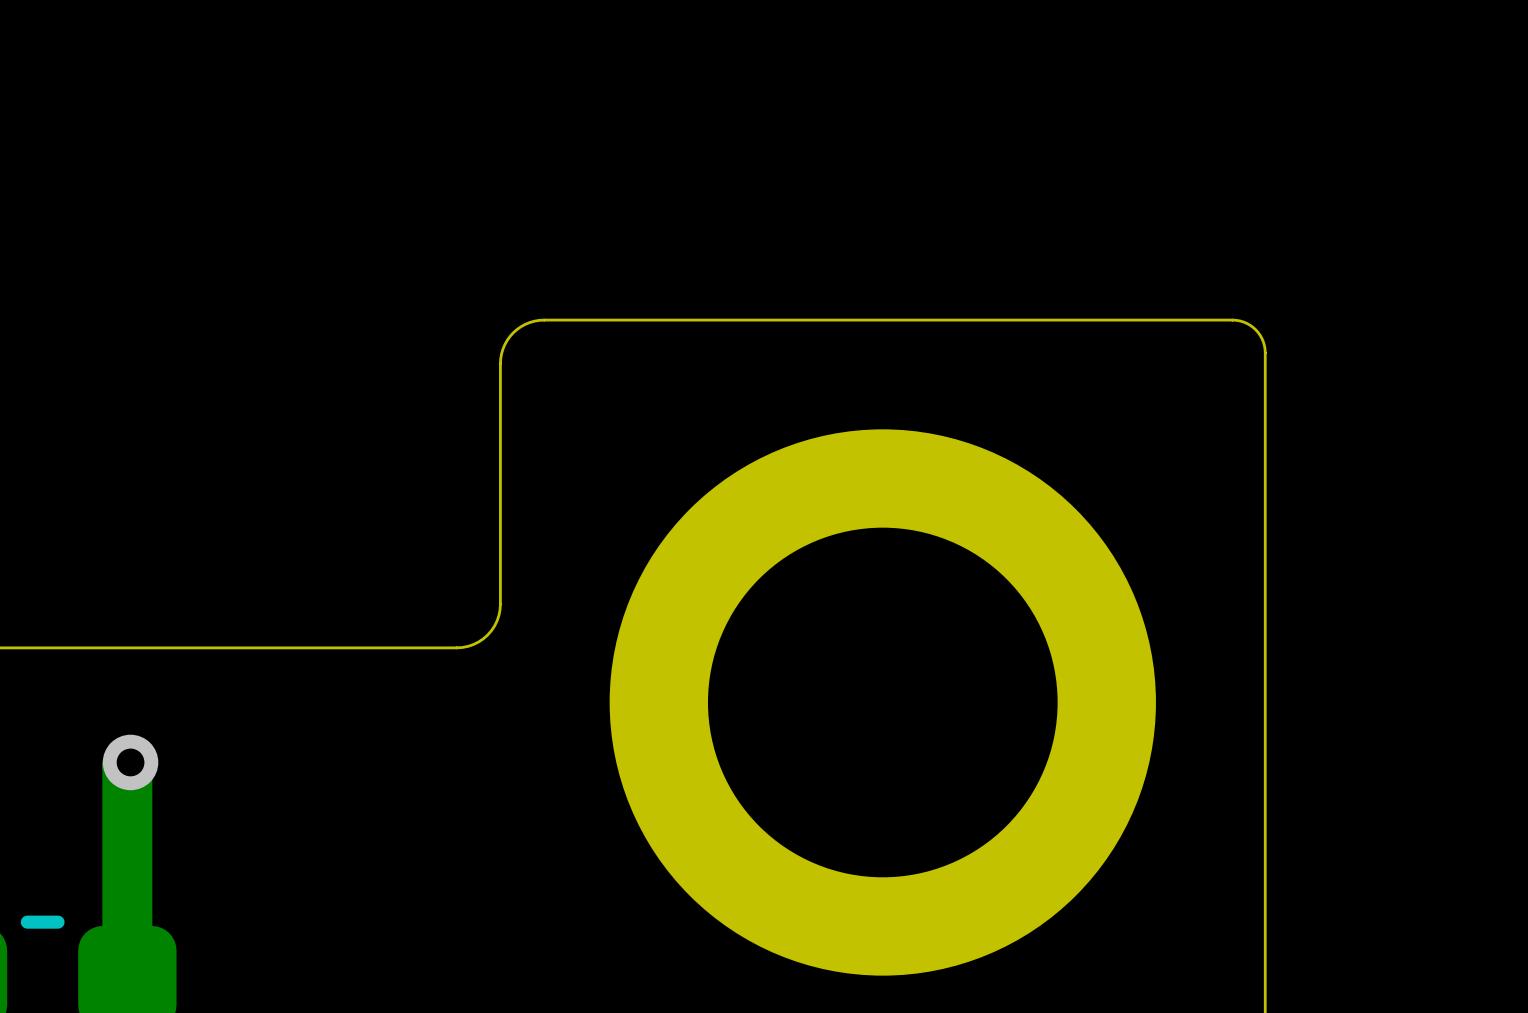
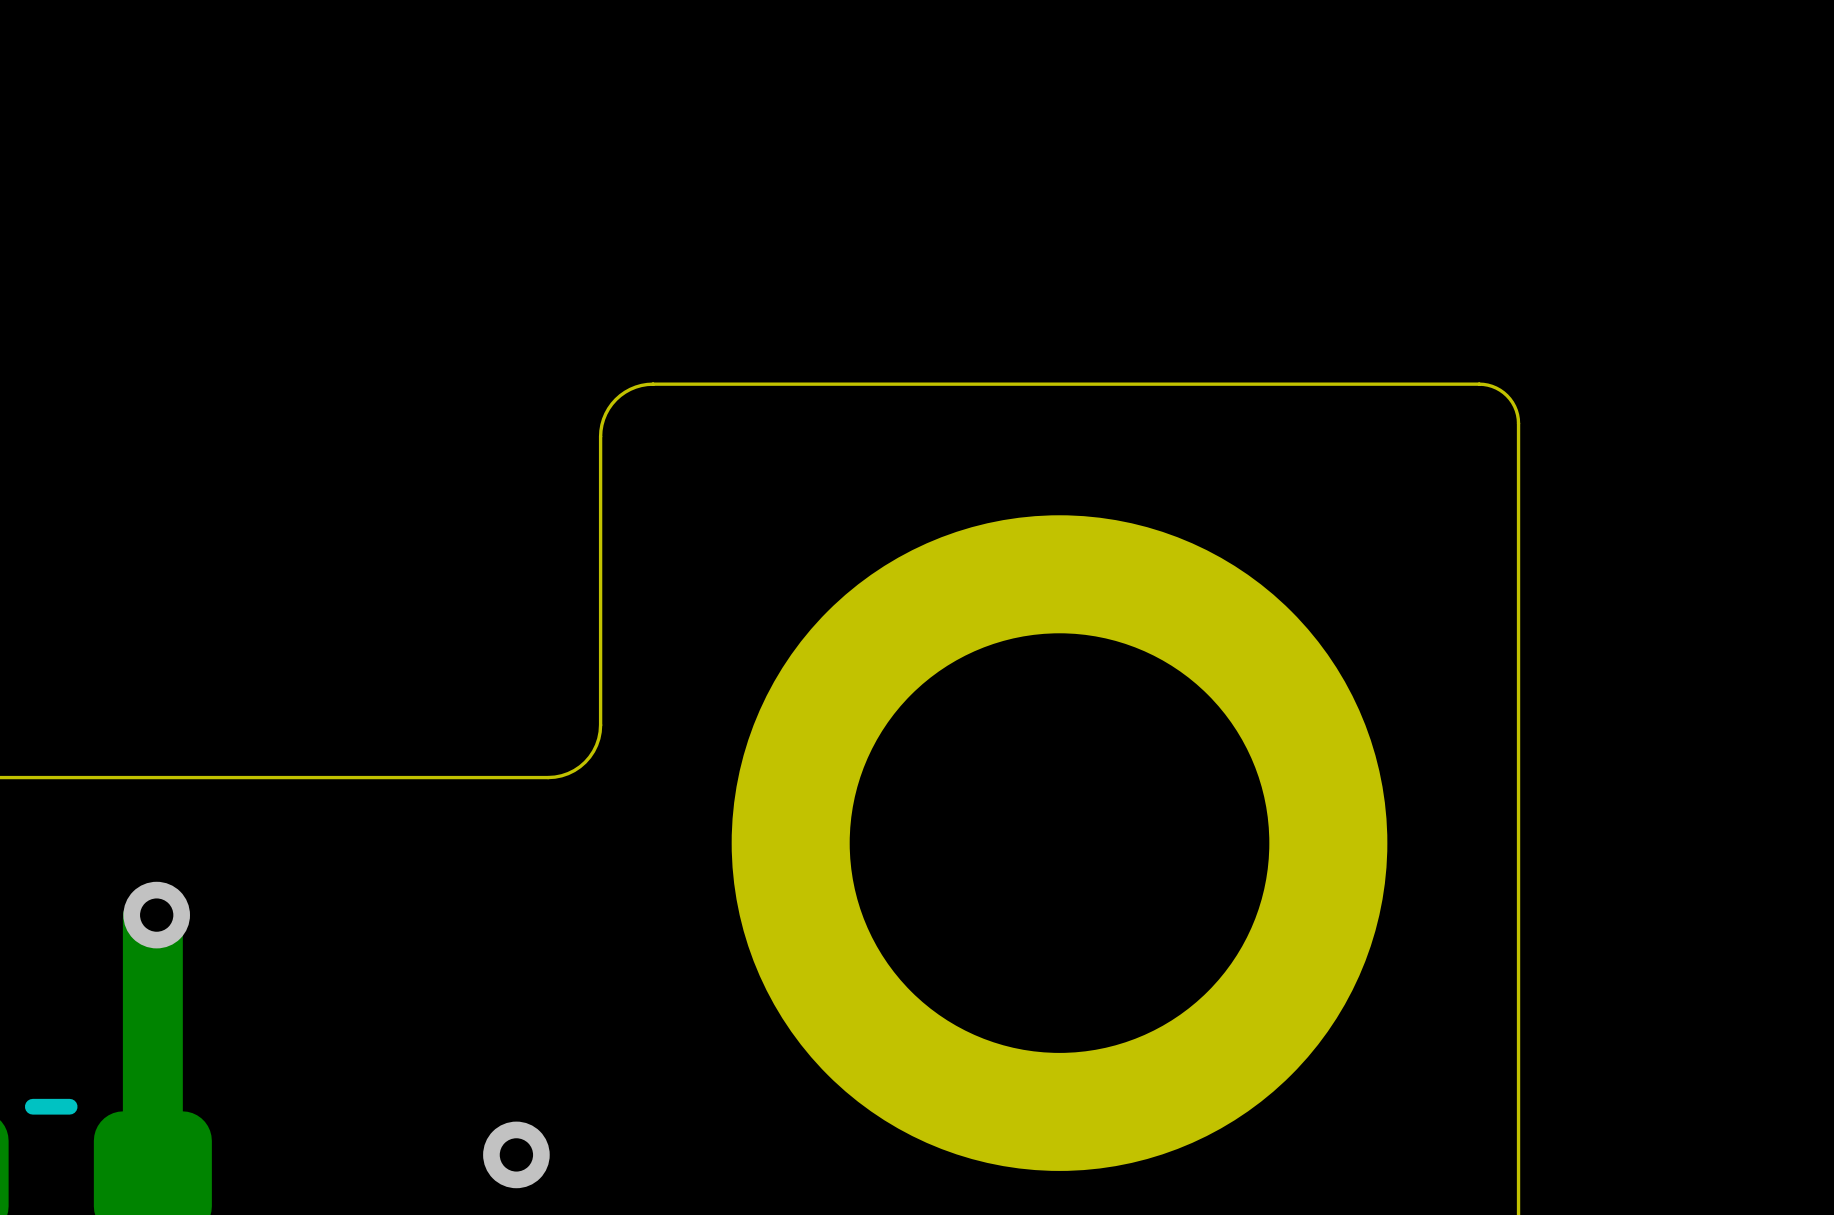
via: none -> (516, 1154)

